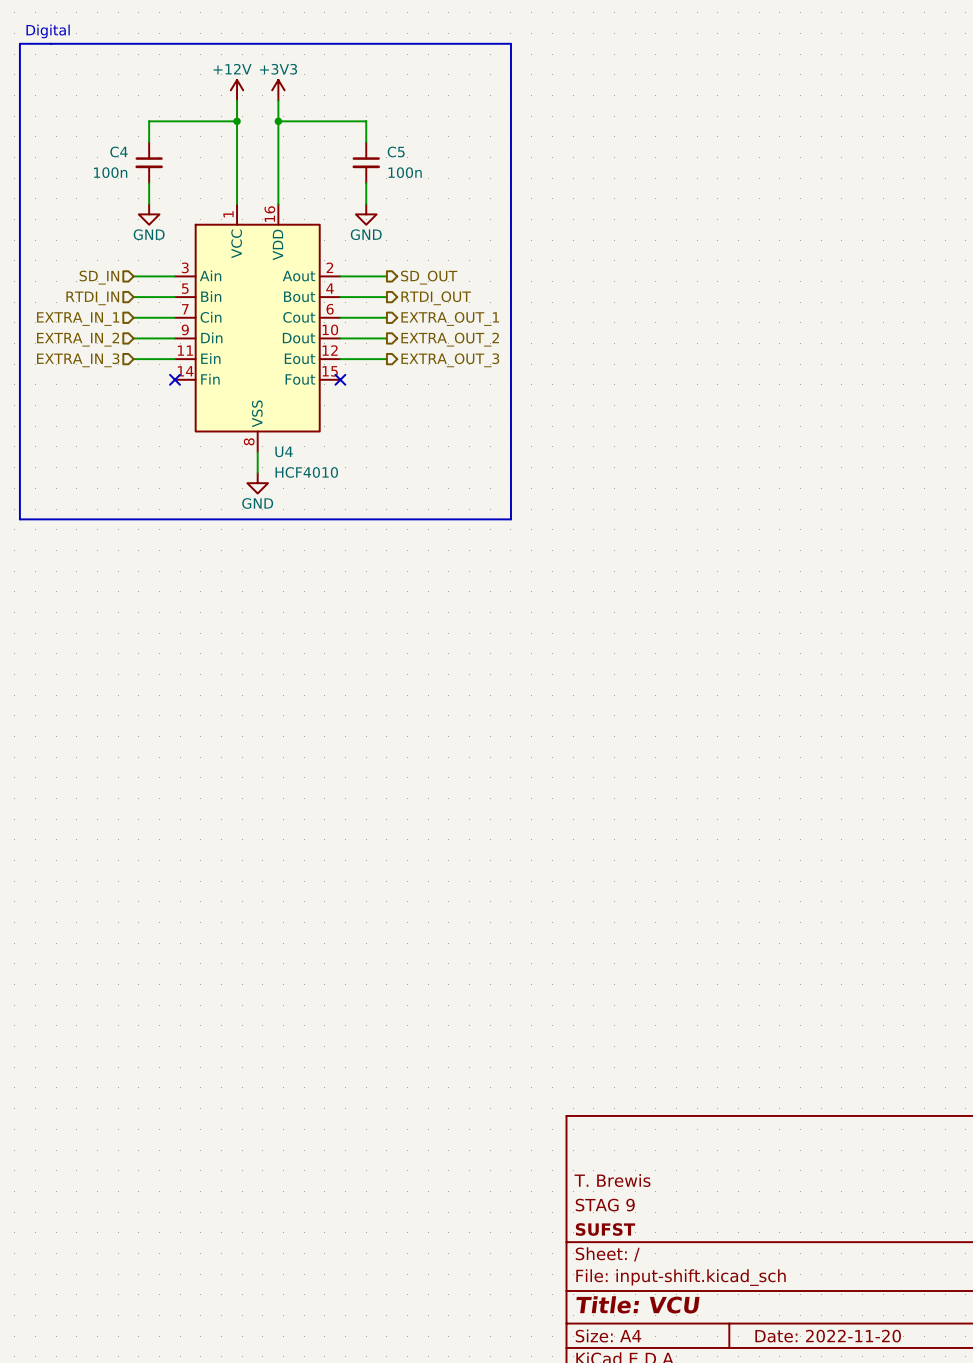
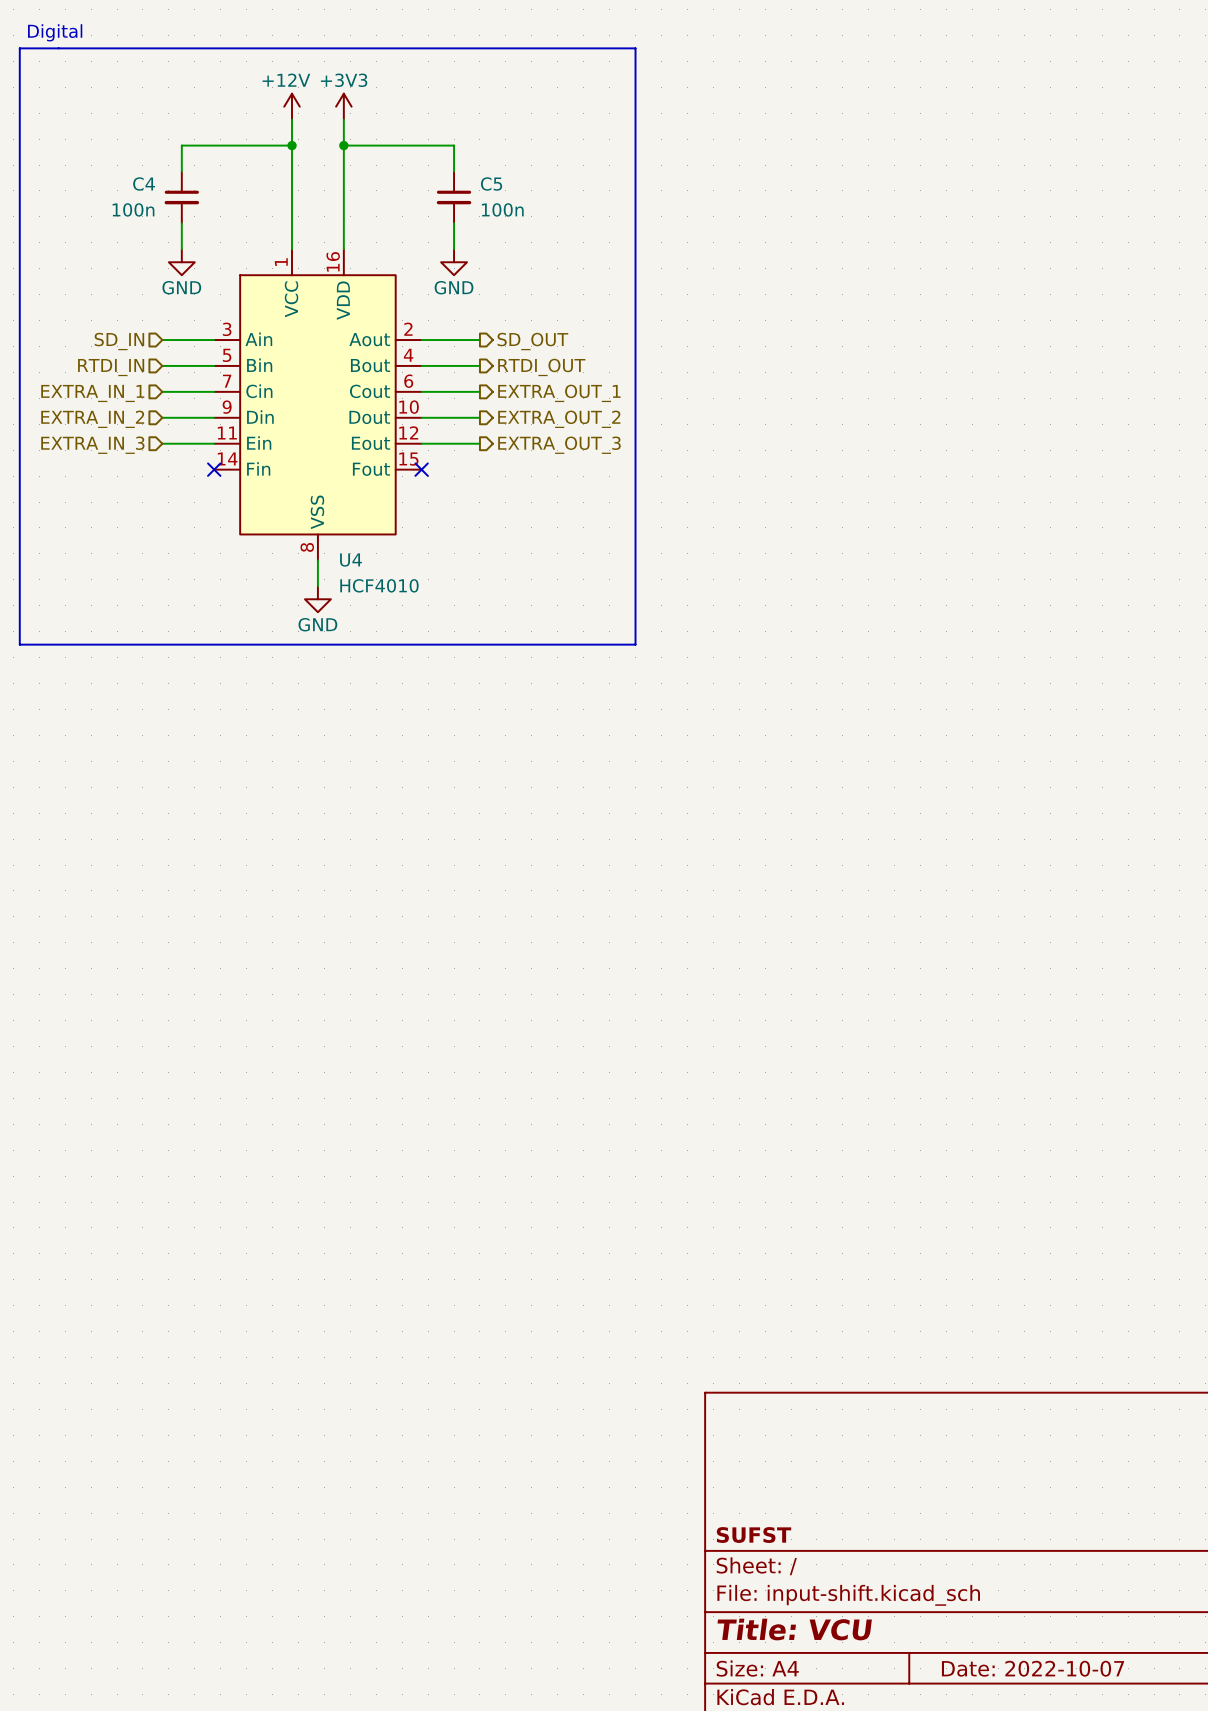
title block: T. Brewis (612, 1180) -> none
title block: STAG 9 (605, 1205) -> none
title block: Date: 2022-11-20 (828, 1336) -> Date: 2022-10-07 (1033, 1668)

